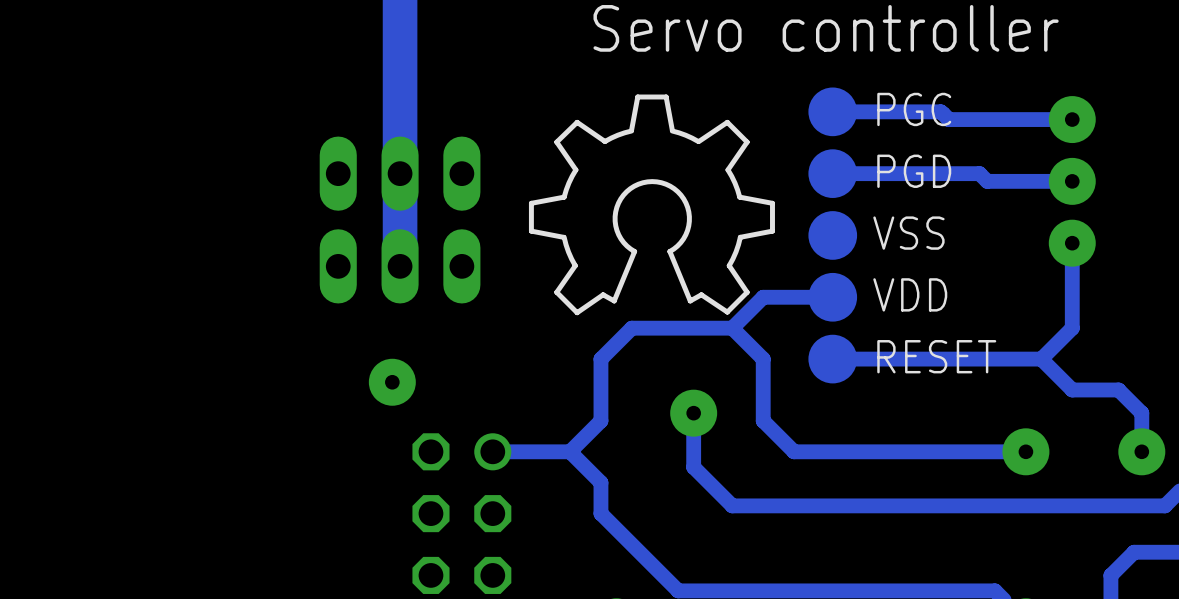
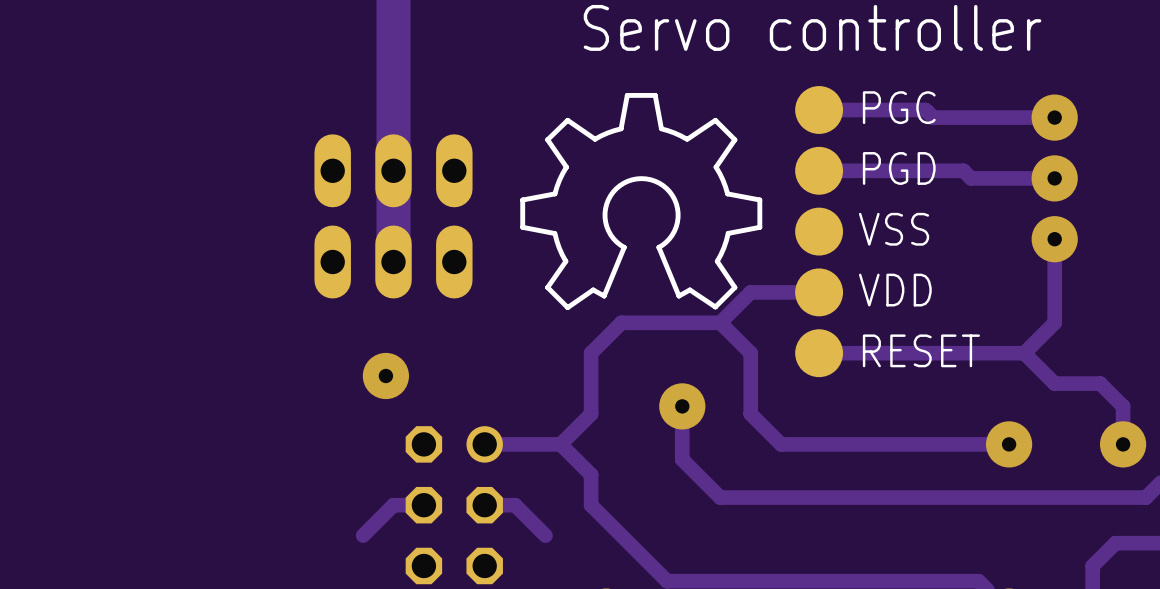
track: none -> (423, 505) (393, 505) (363, 535)
track: none -> (484, 505) (515, 505) (545, 535)

